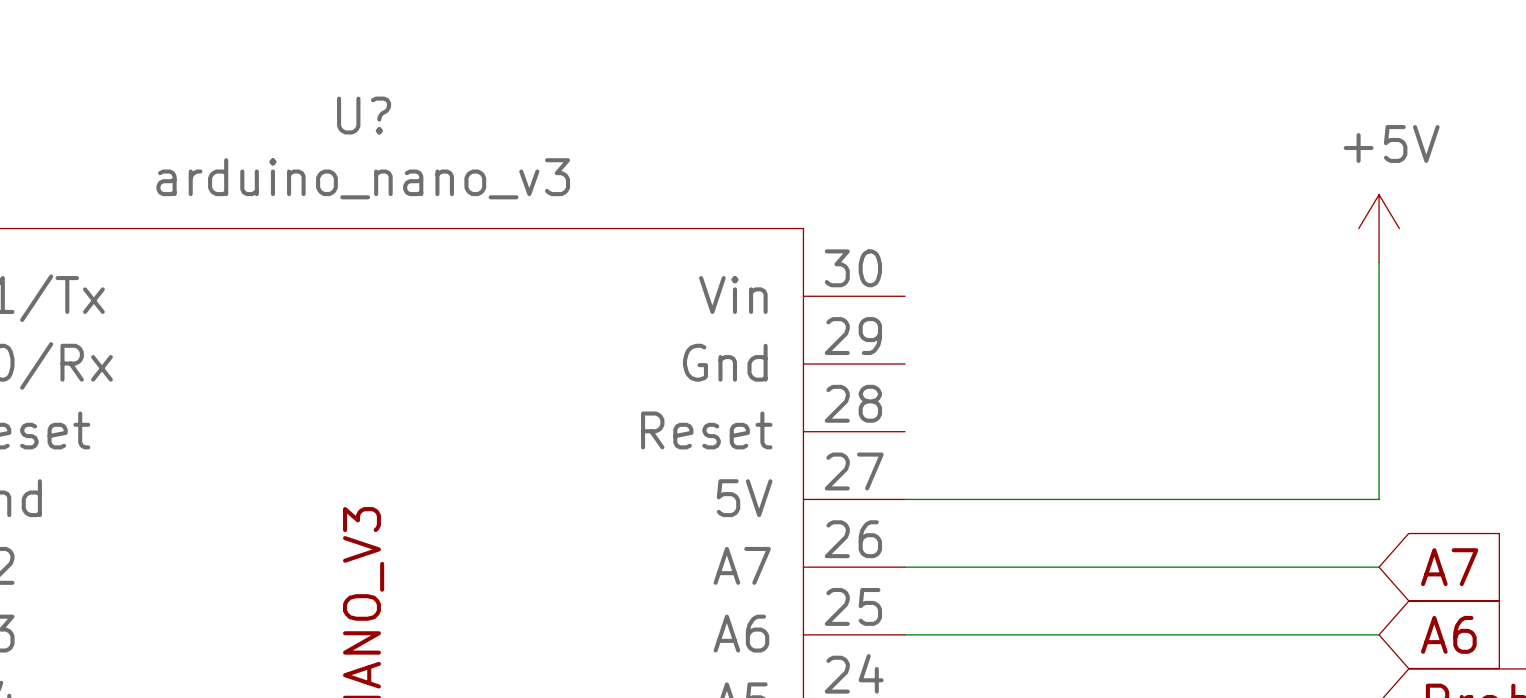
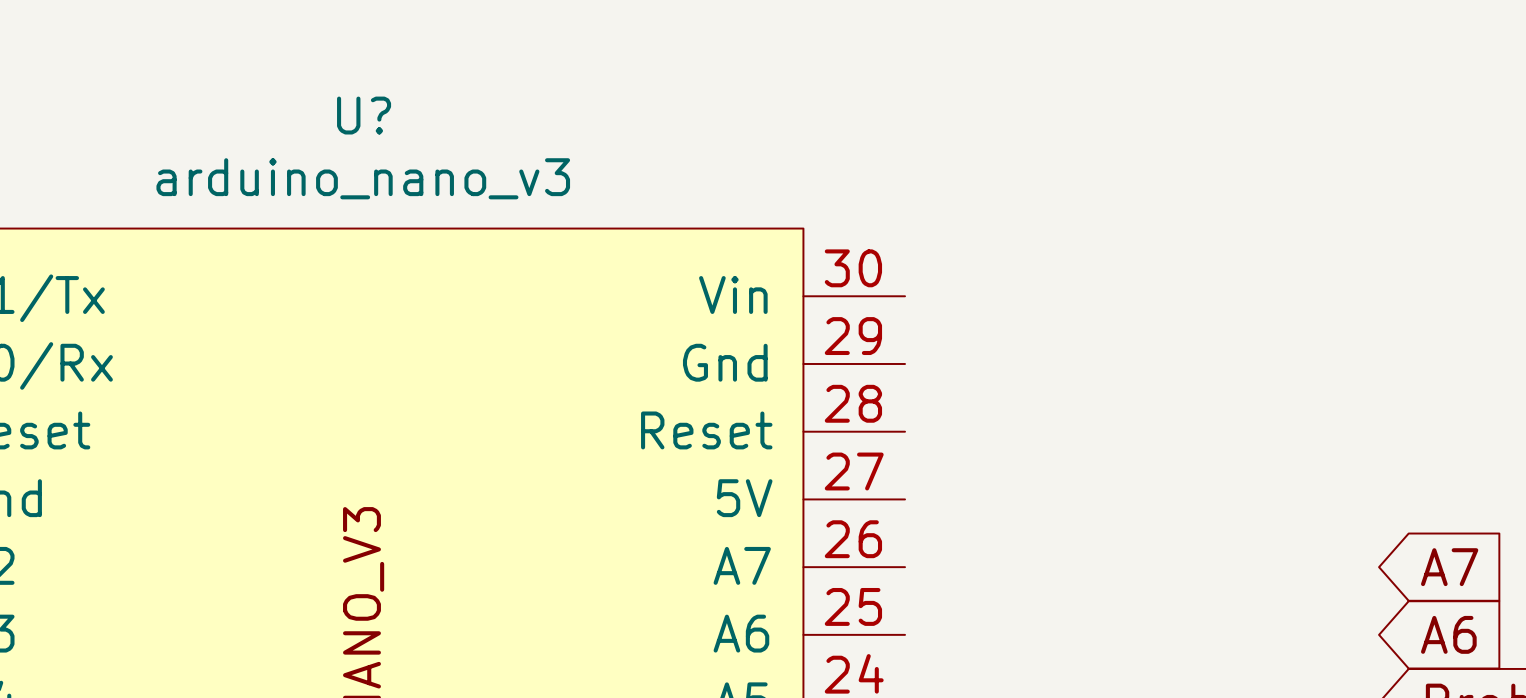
power symbol: +5V (1379, 228) -> none
wire: (1379, 262) (1379, 499) (905, 499) -> none
wire: (905, 567) (1379, 567) -> none
wire: (905, 634) (1379, 634) -> none

